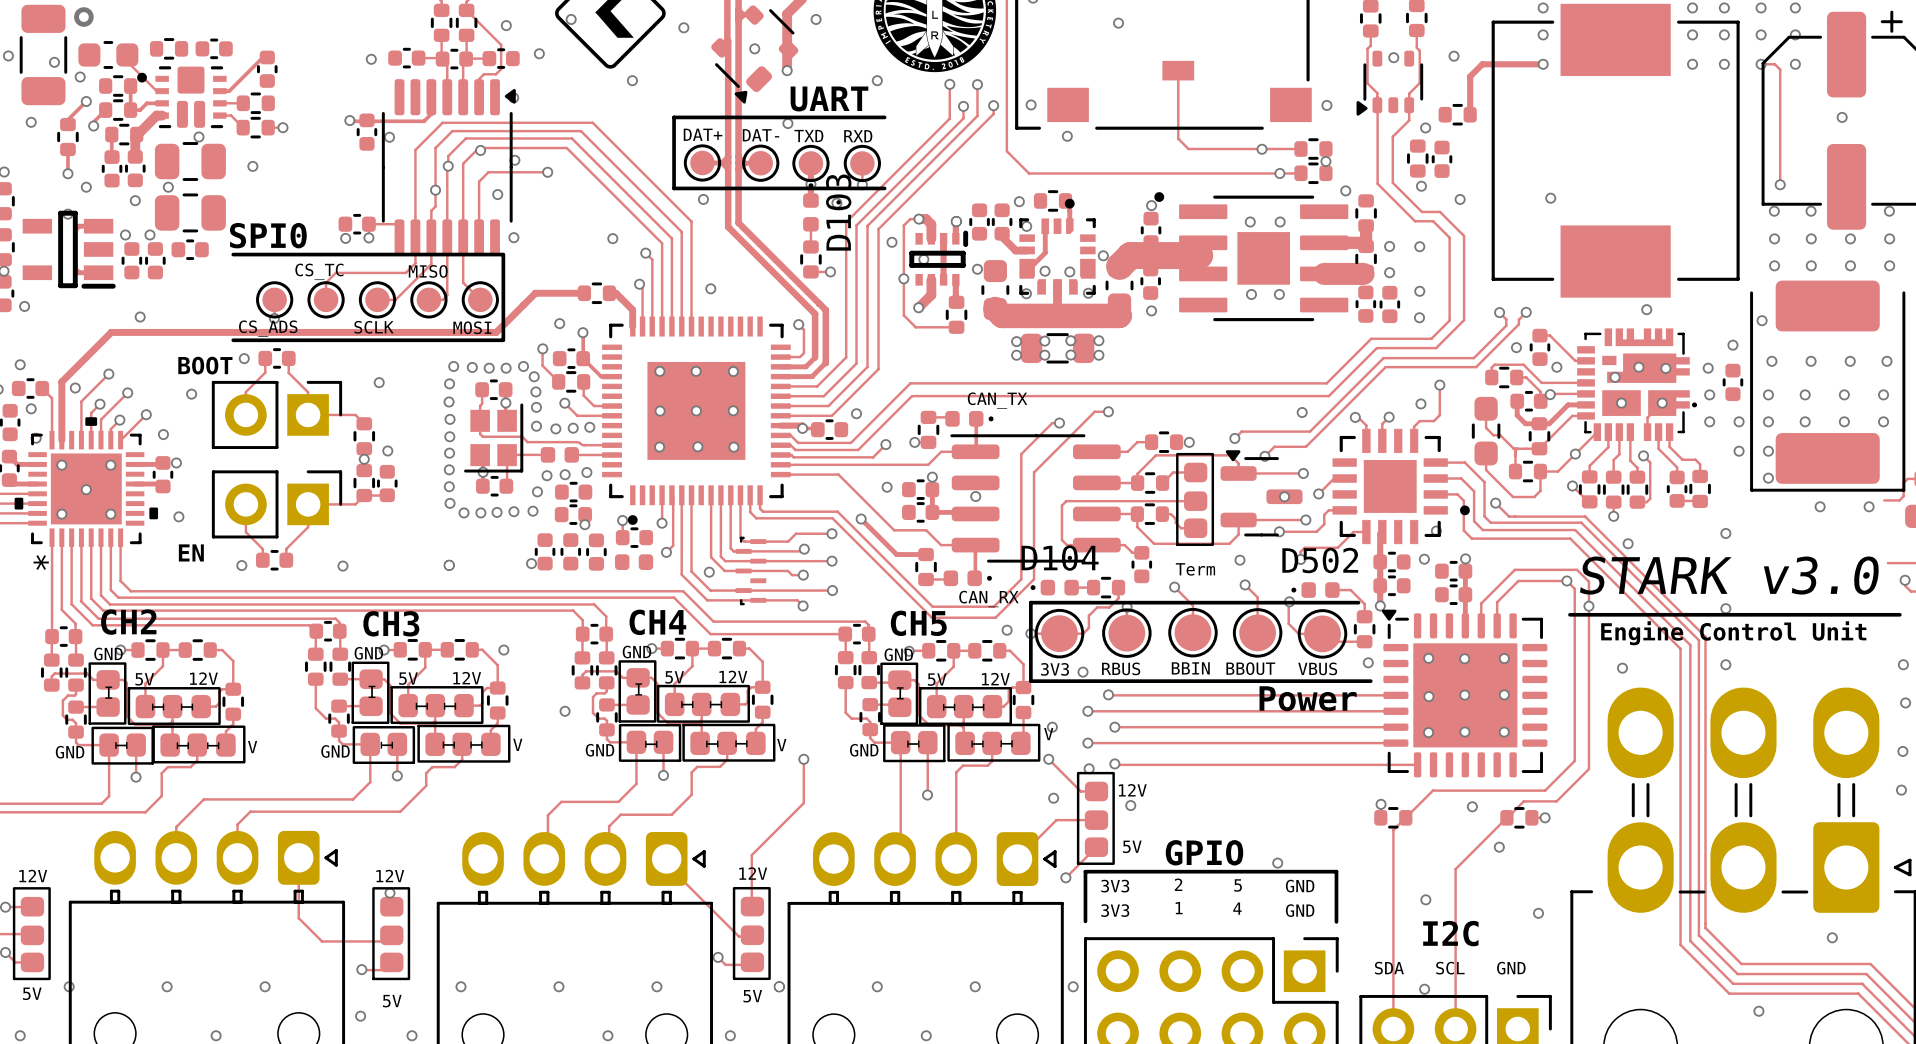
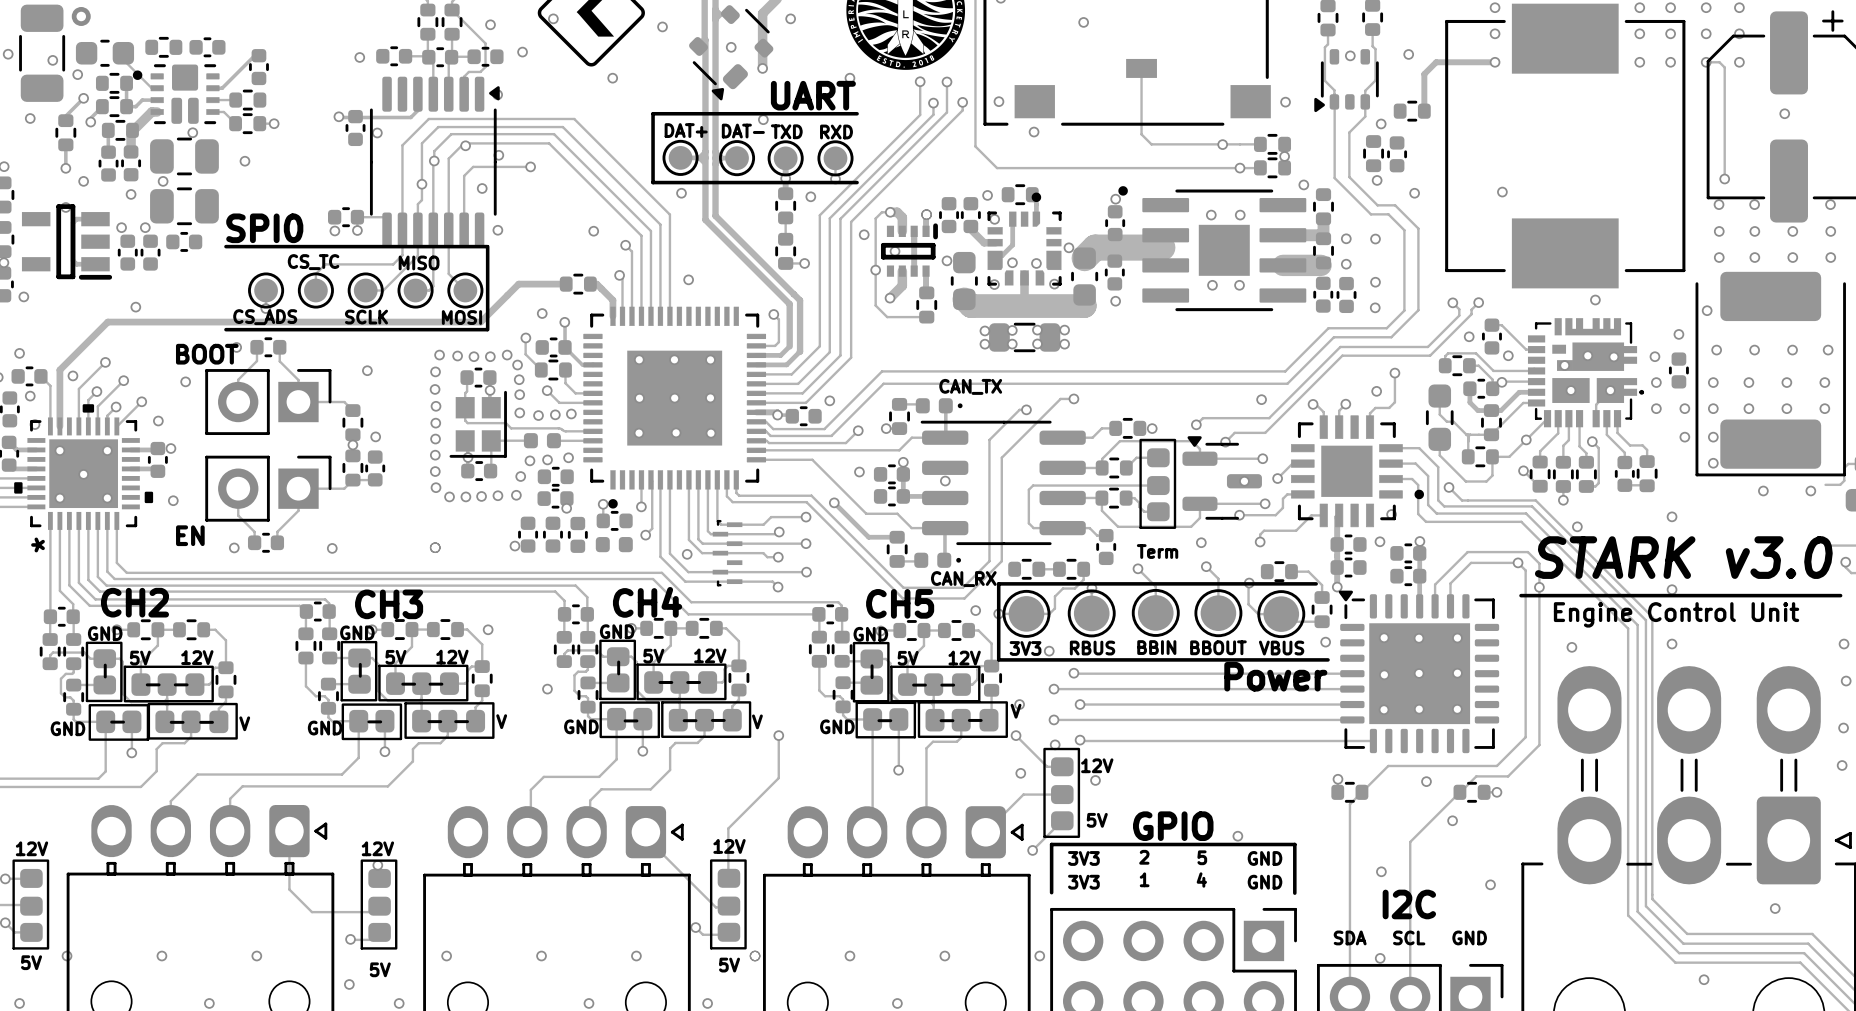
D103: (810, 207) -> none
part: none -> (785, 205)
D104: (1054, 587) -> none
part: none -> (1026, 569)
D502: (1315, 590) -> none
part: none -> (1279, 571)

